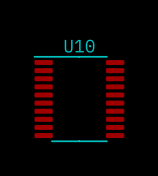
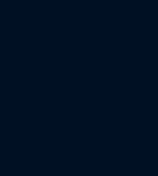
U10: (79, 99) -> none

